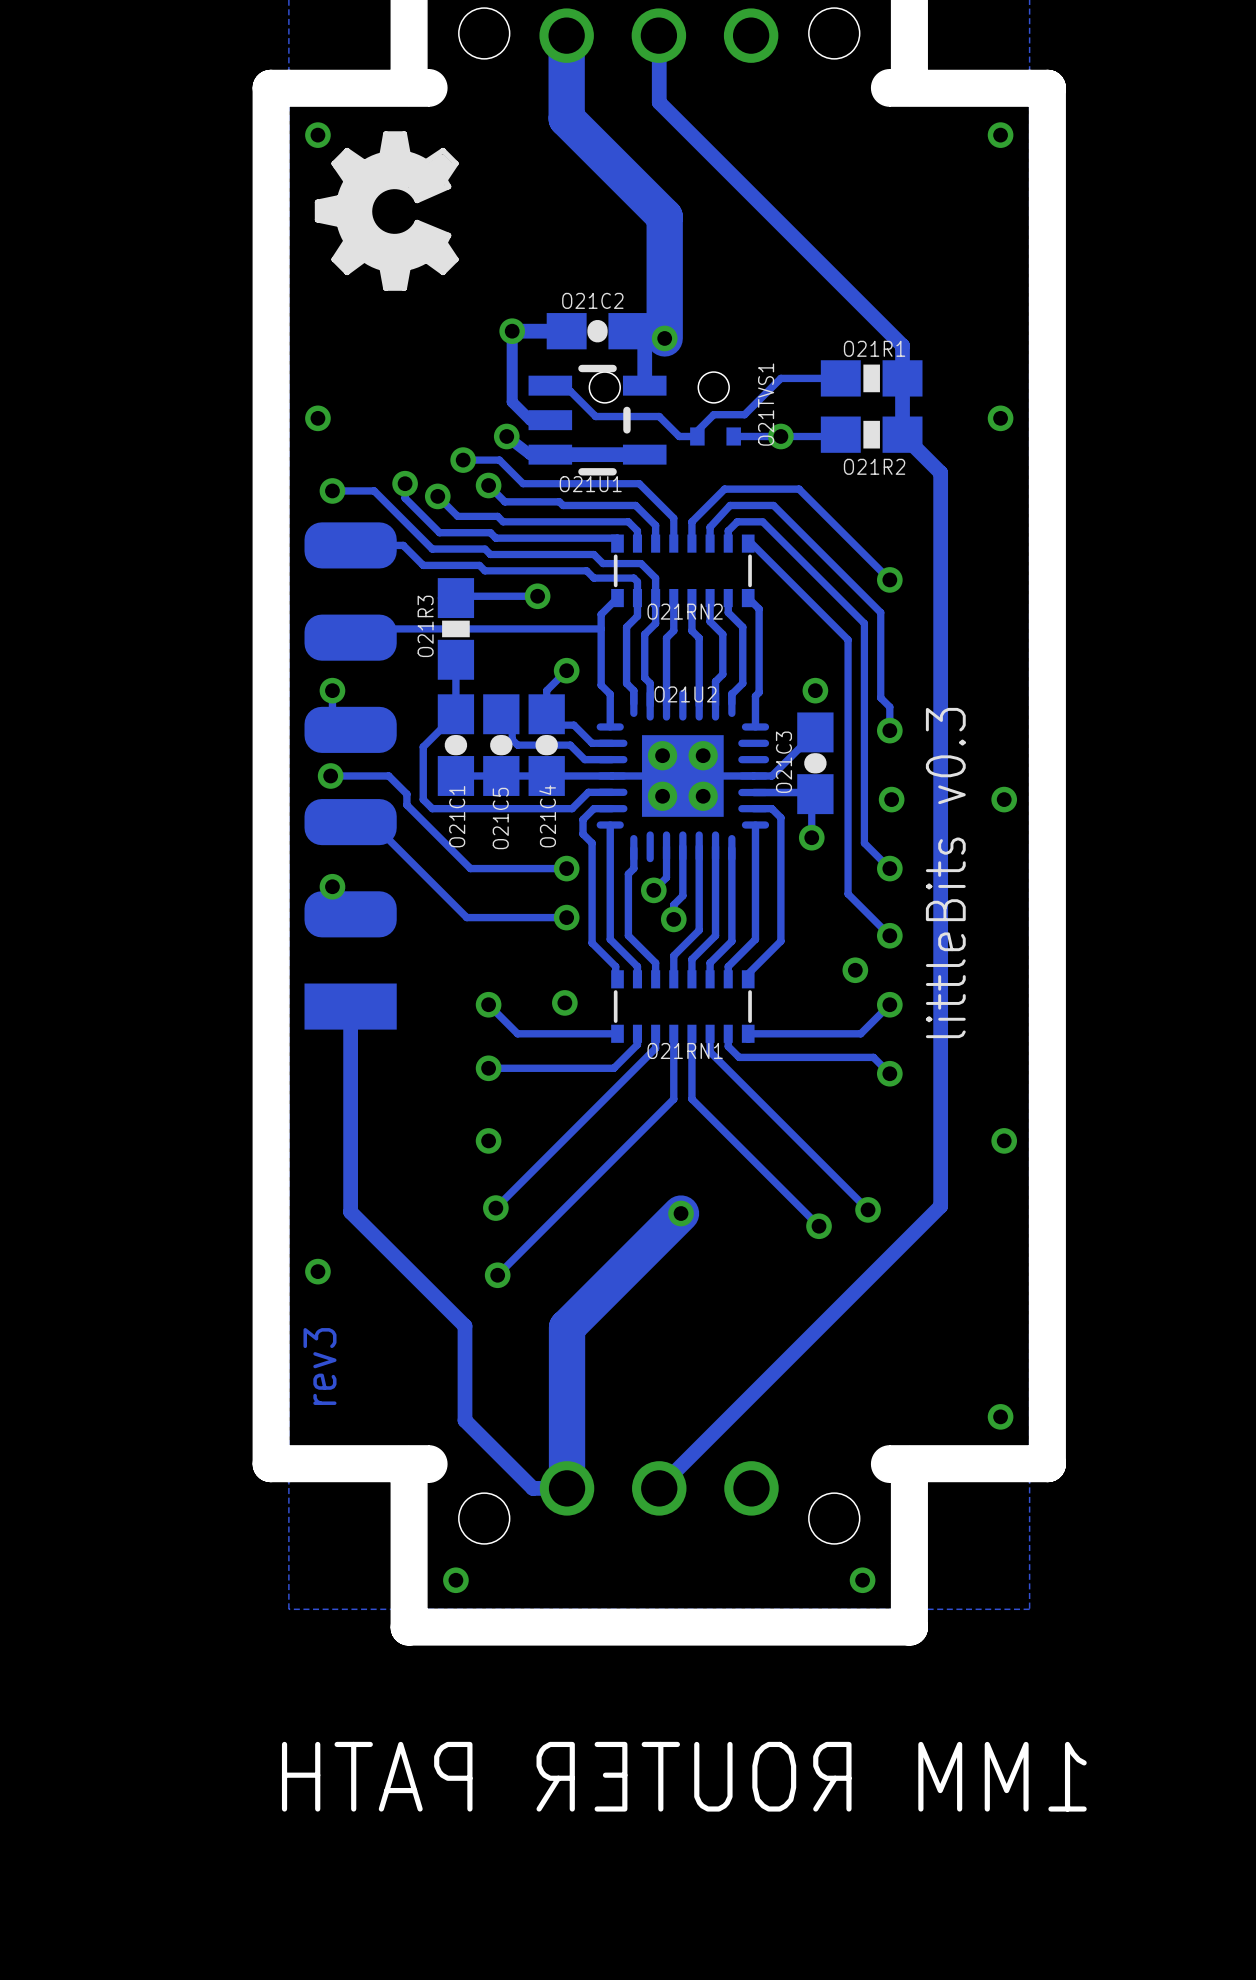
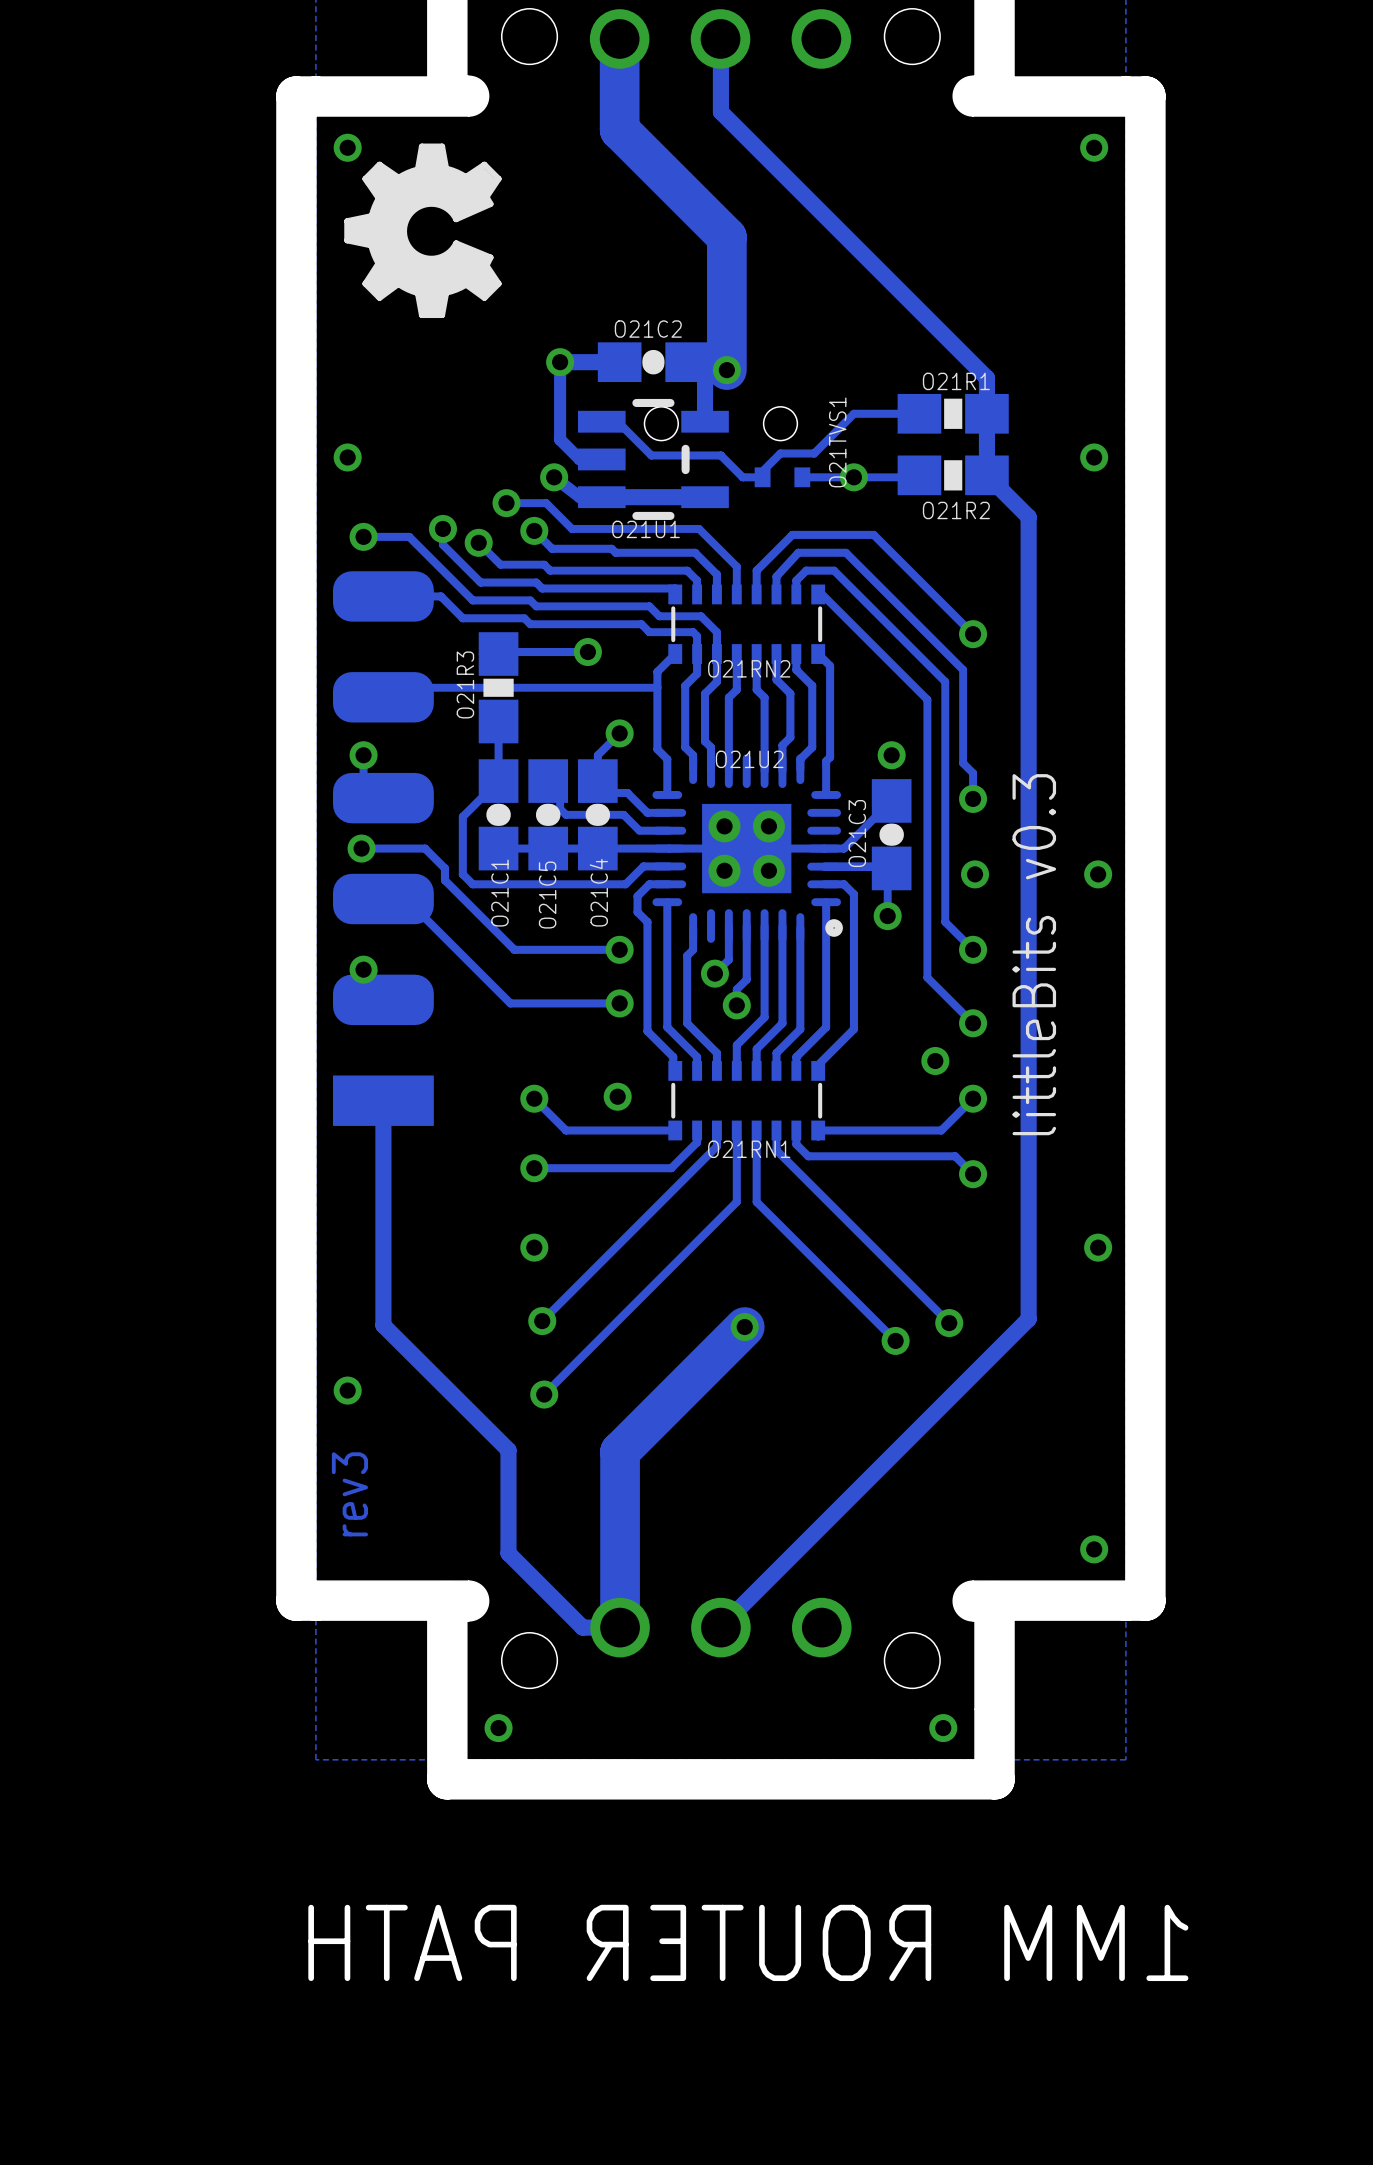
O21U2 footprint: [596, 689, 770, 863] -> [652, 754, 843, 943]

